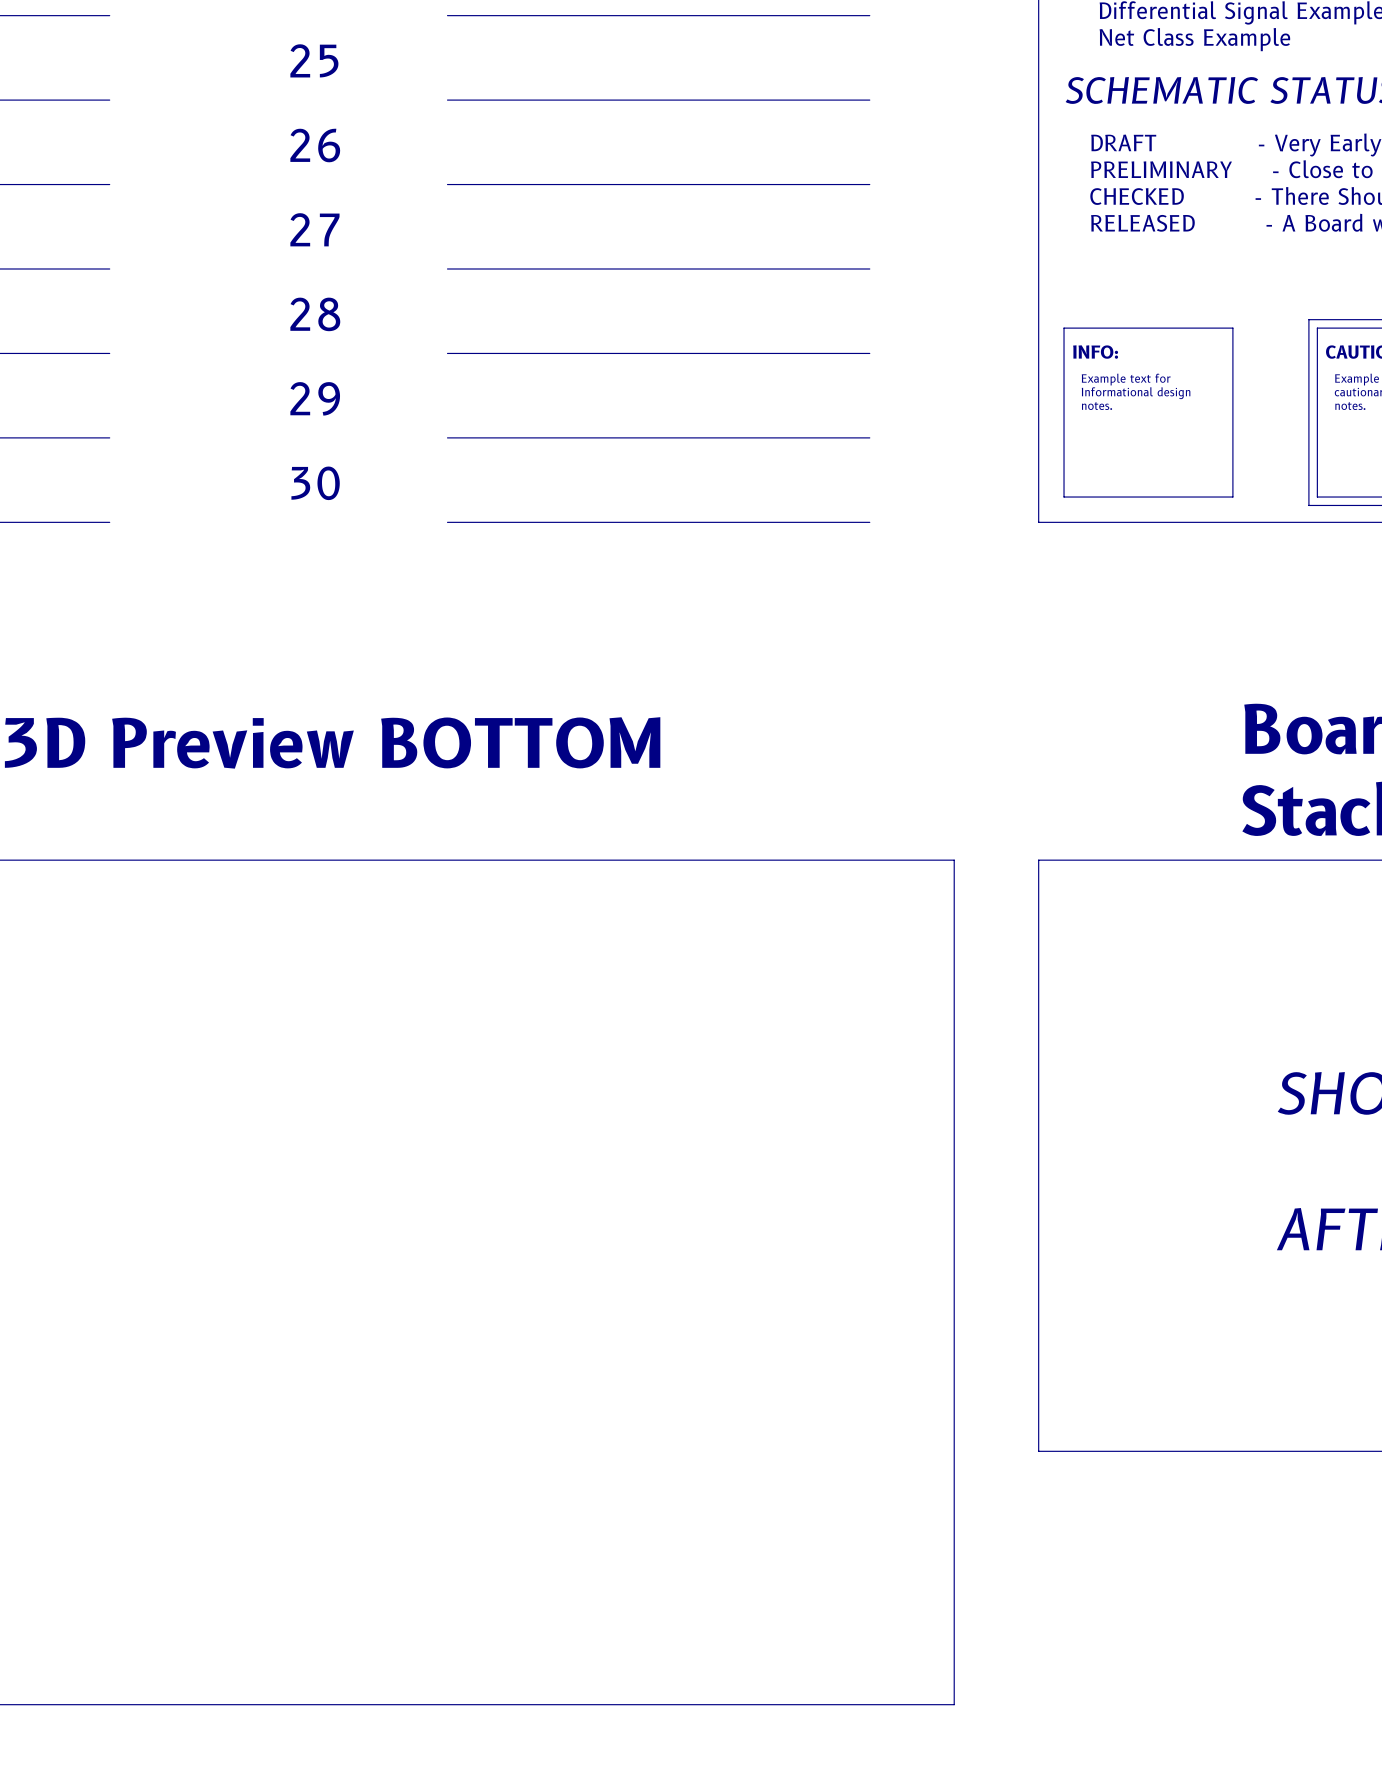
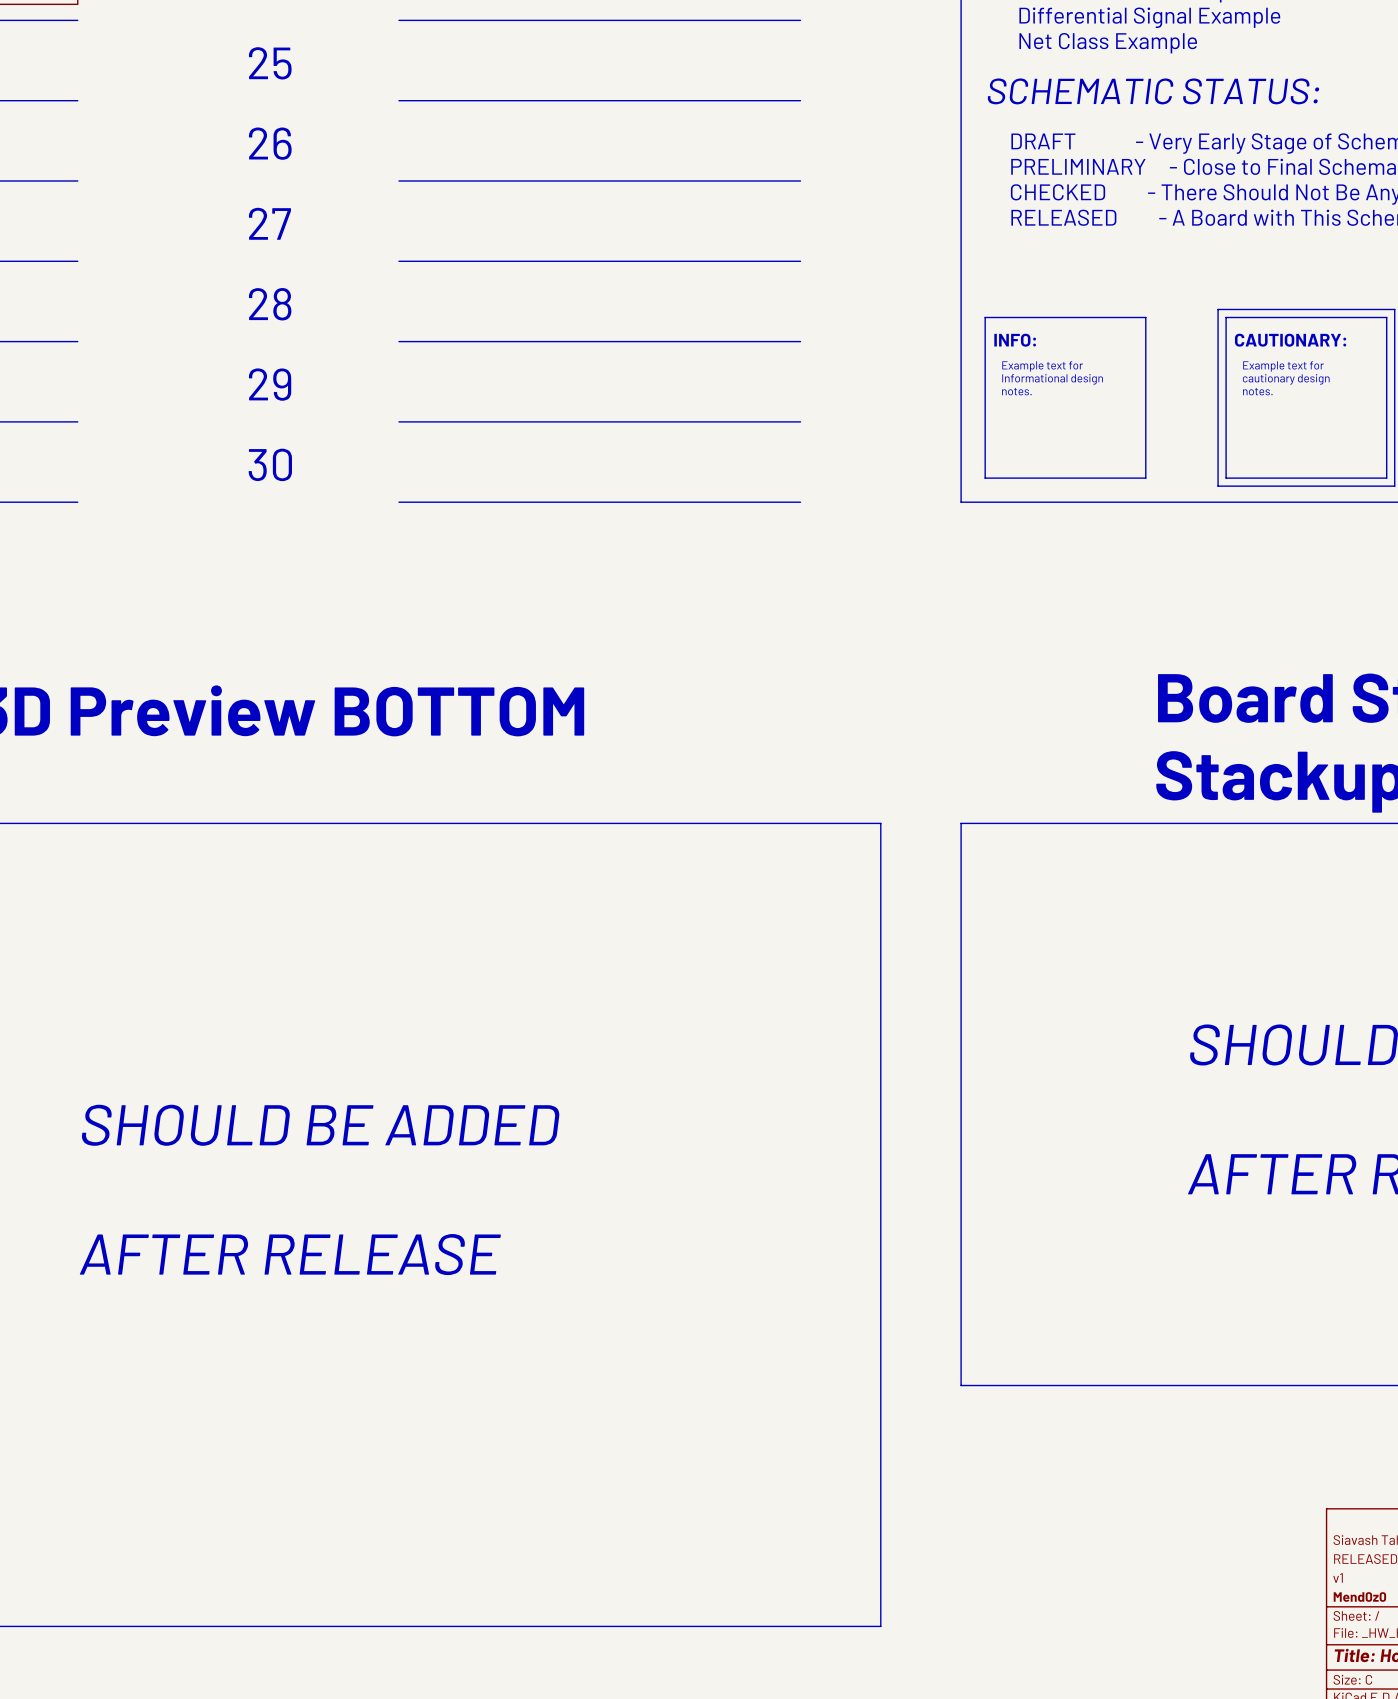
text: none -> SHOULD BE ADDED (320, 1125)
text: none -> AFTER RELEASE (290, 1254)

